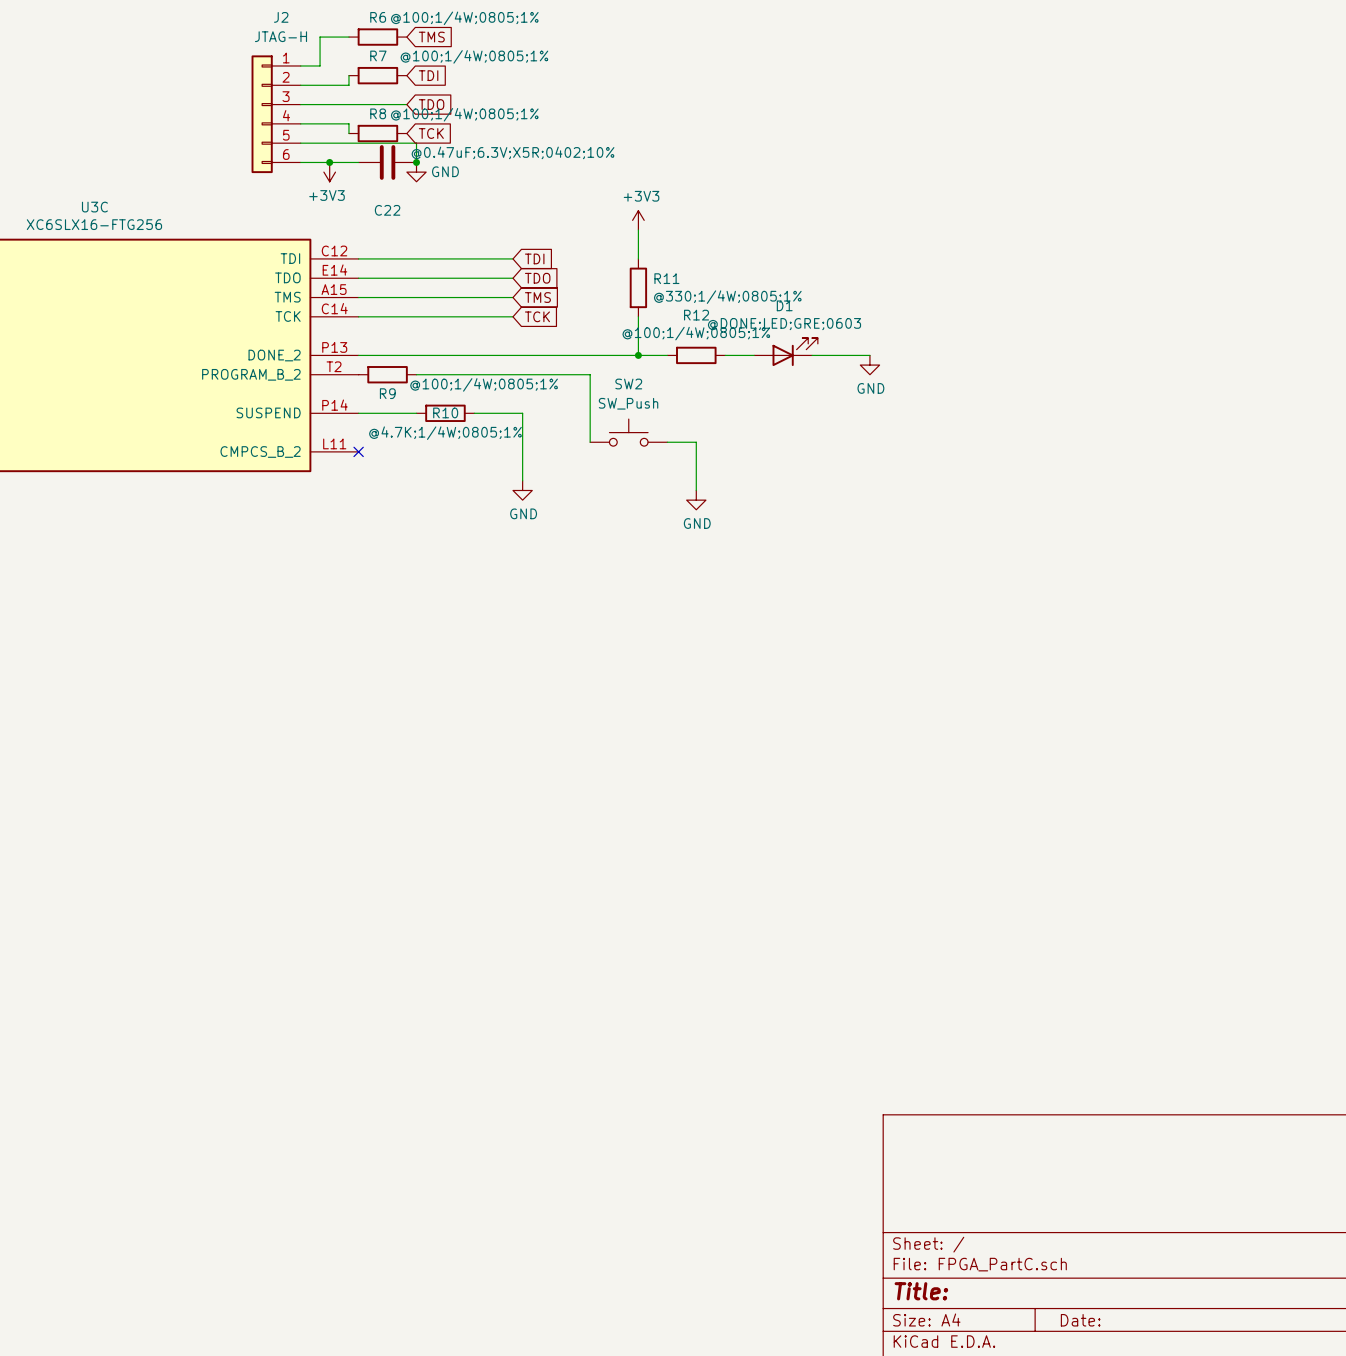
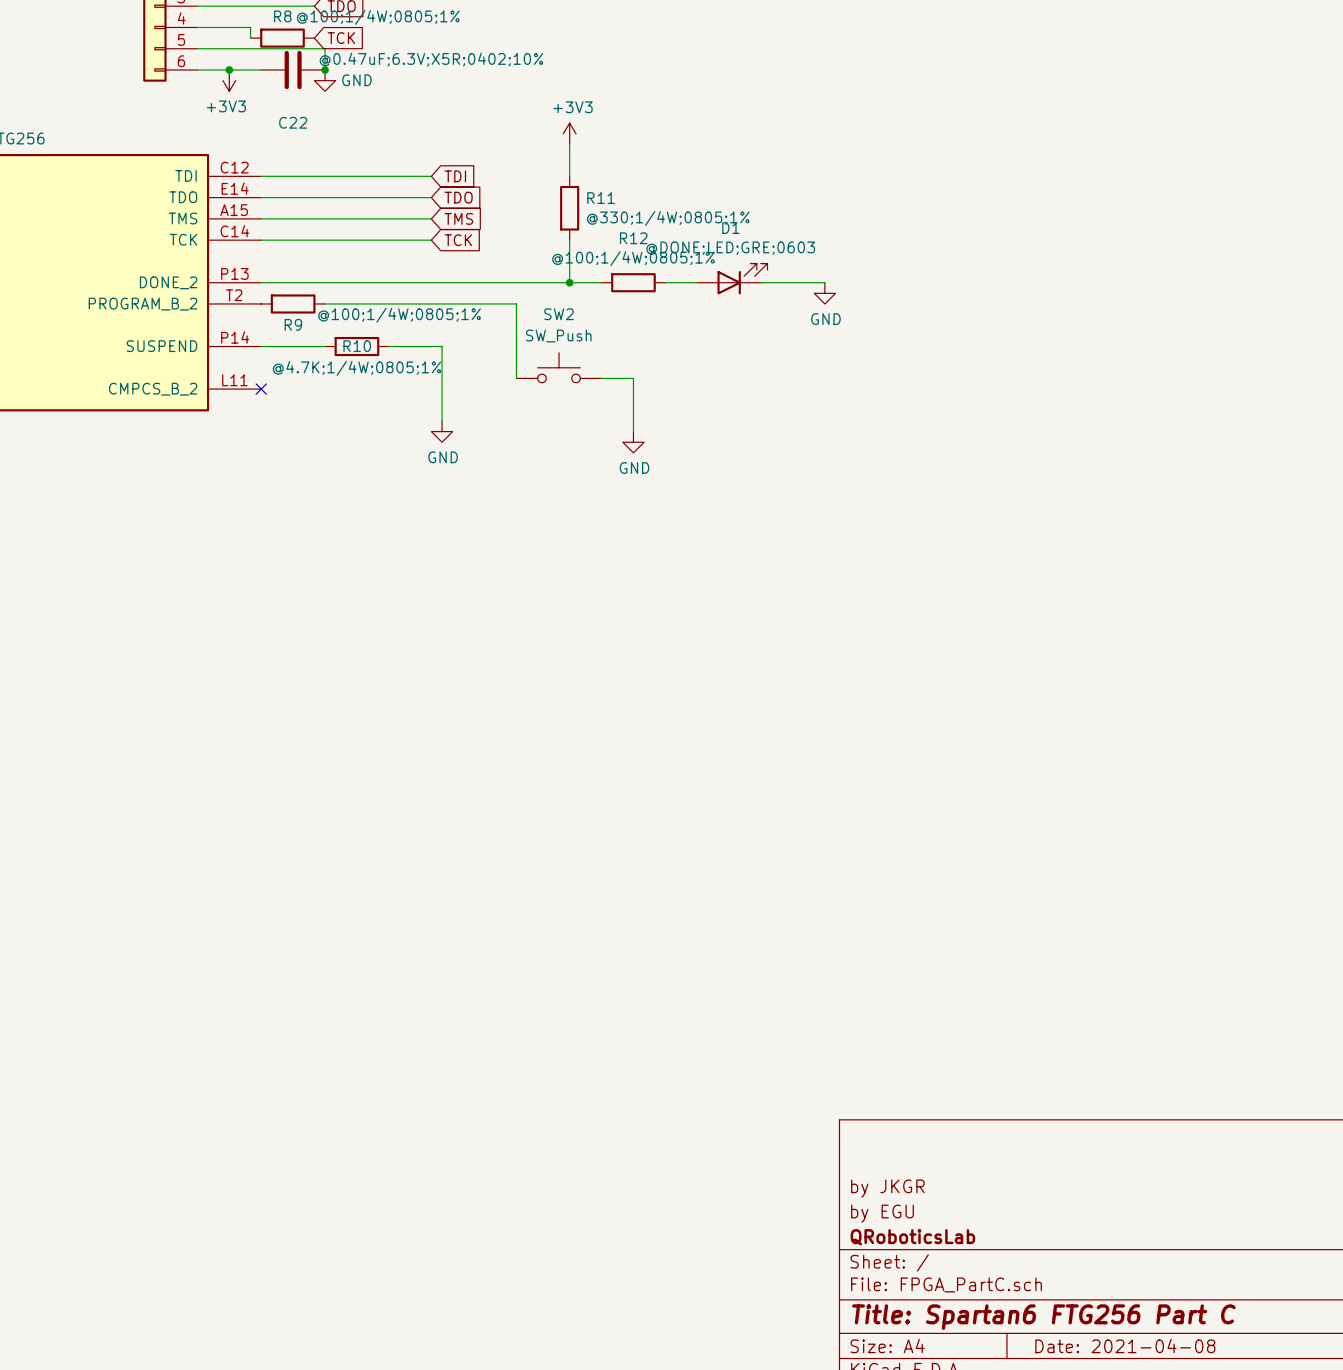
title block: none -> by JKGR (887, 1188)
title block: none -> by EGU (882, 1213)
title block: none -> QRoboticsLab (912, 1237)
title block: Title: (921, 1291) -> Title: Spartan6 FTG256 Part C (1043, 1317)
title block: Date: (1080, 1320) -> Date: 2021-04-08 (1125, 1346)

